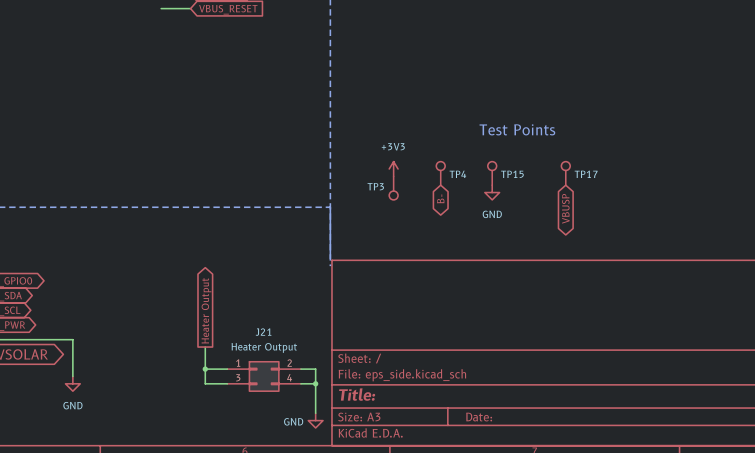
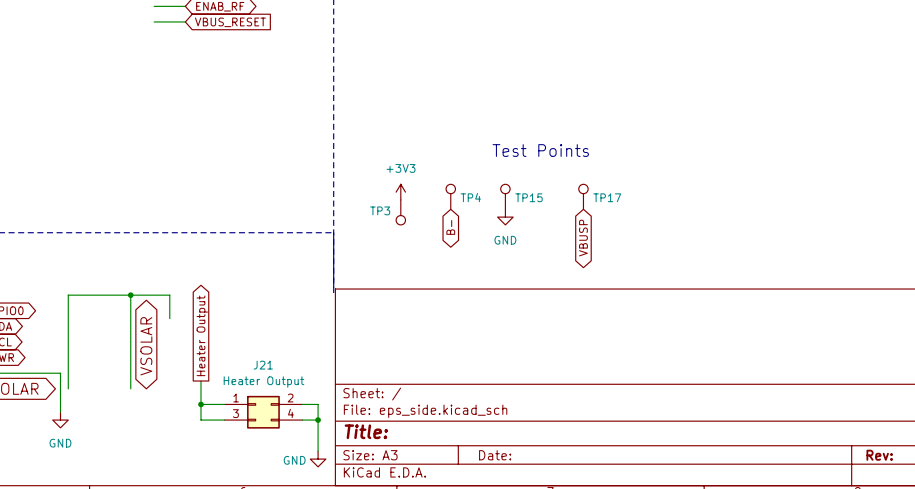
wire: none -> (130, 295) (130, 388)
junction: none -> (130, 295)
wire: none -> (169, 318) (169, 295) (68, 295) (68, 388)
global label: none -> VSOLAR (146, 346)

